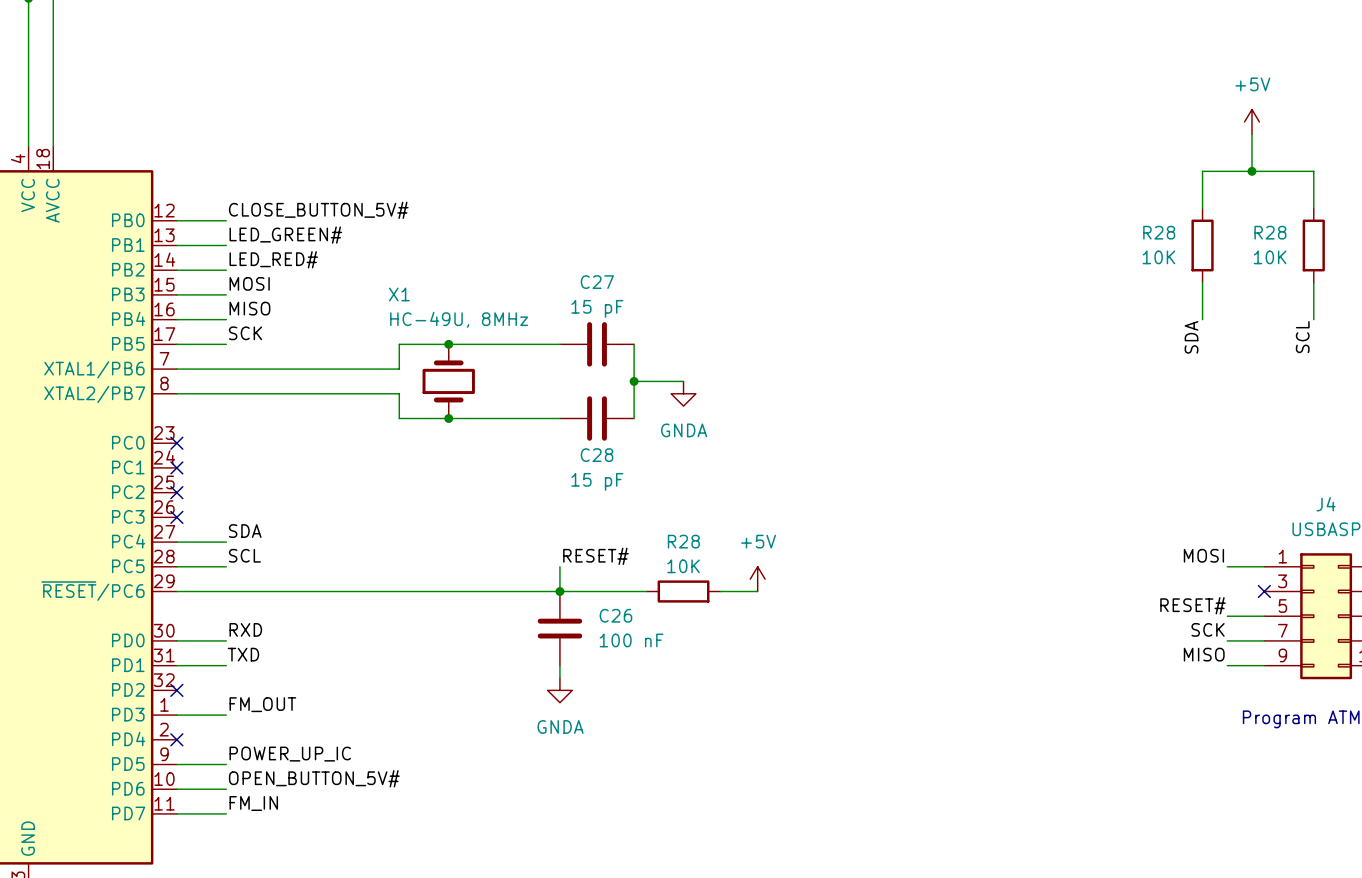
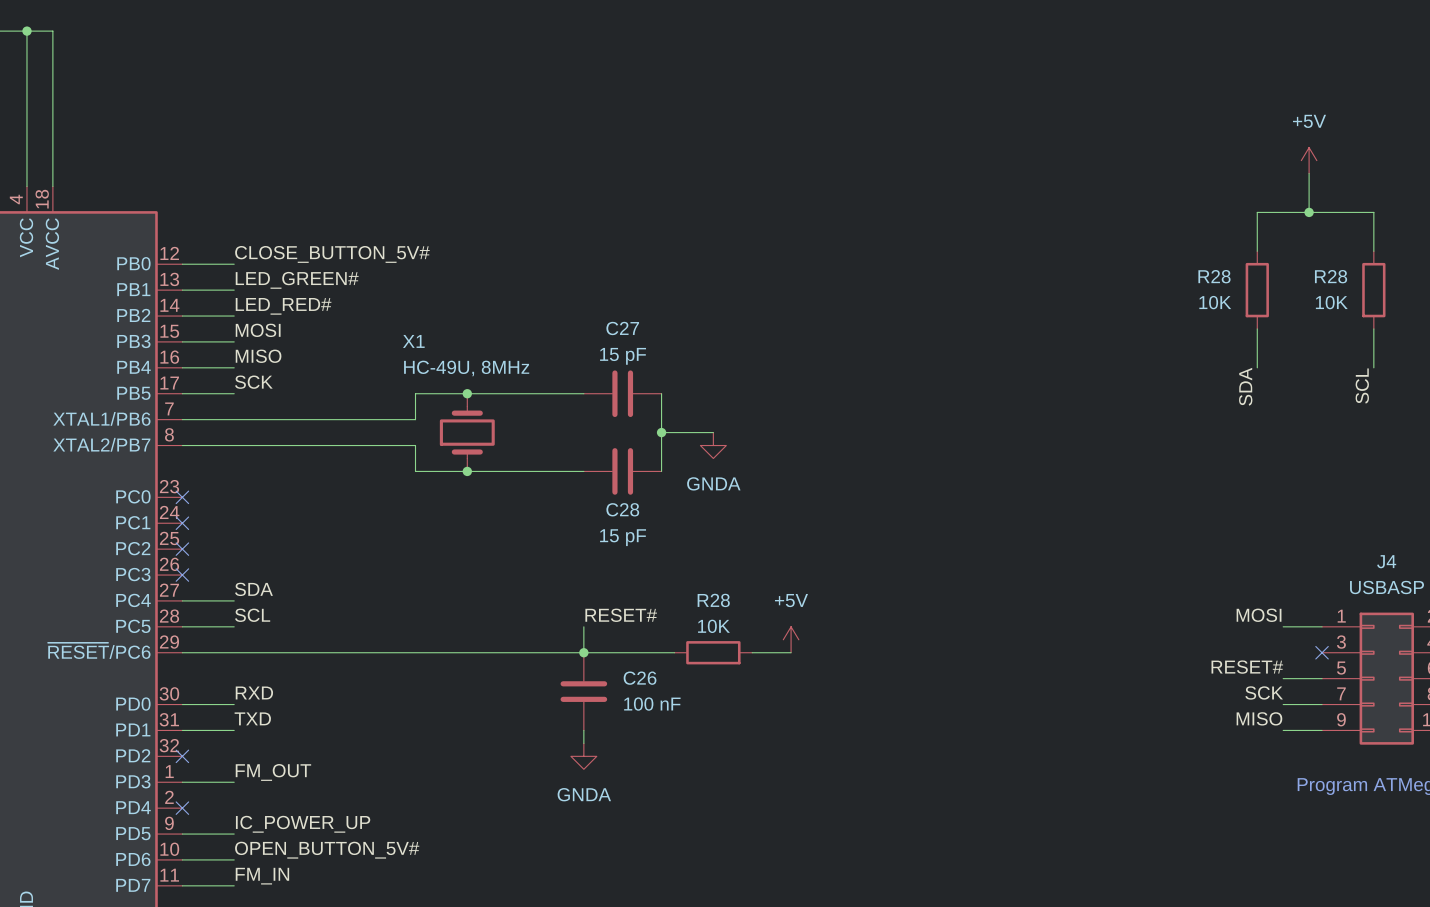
label: POWER_UP_IC (290, 754) -> IC_POWER_UP (303, 824)

